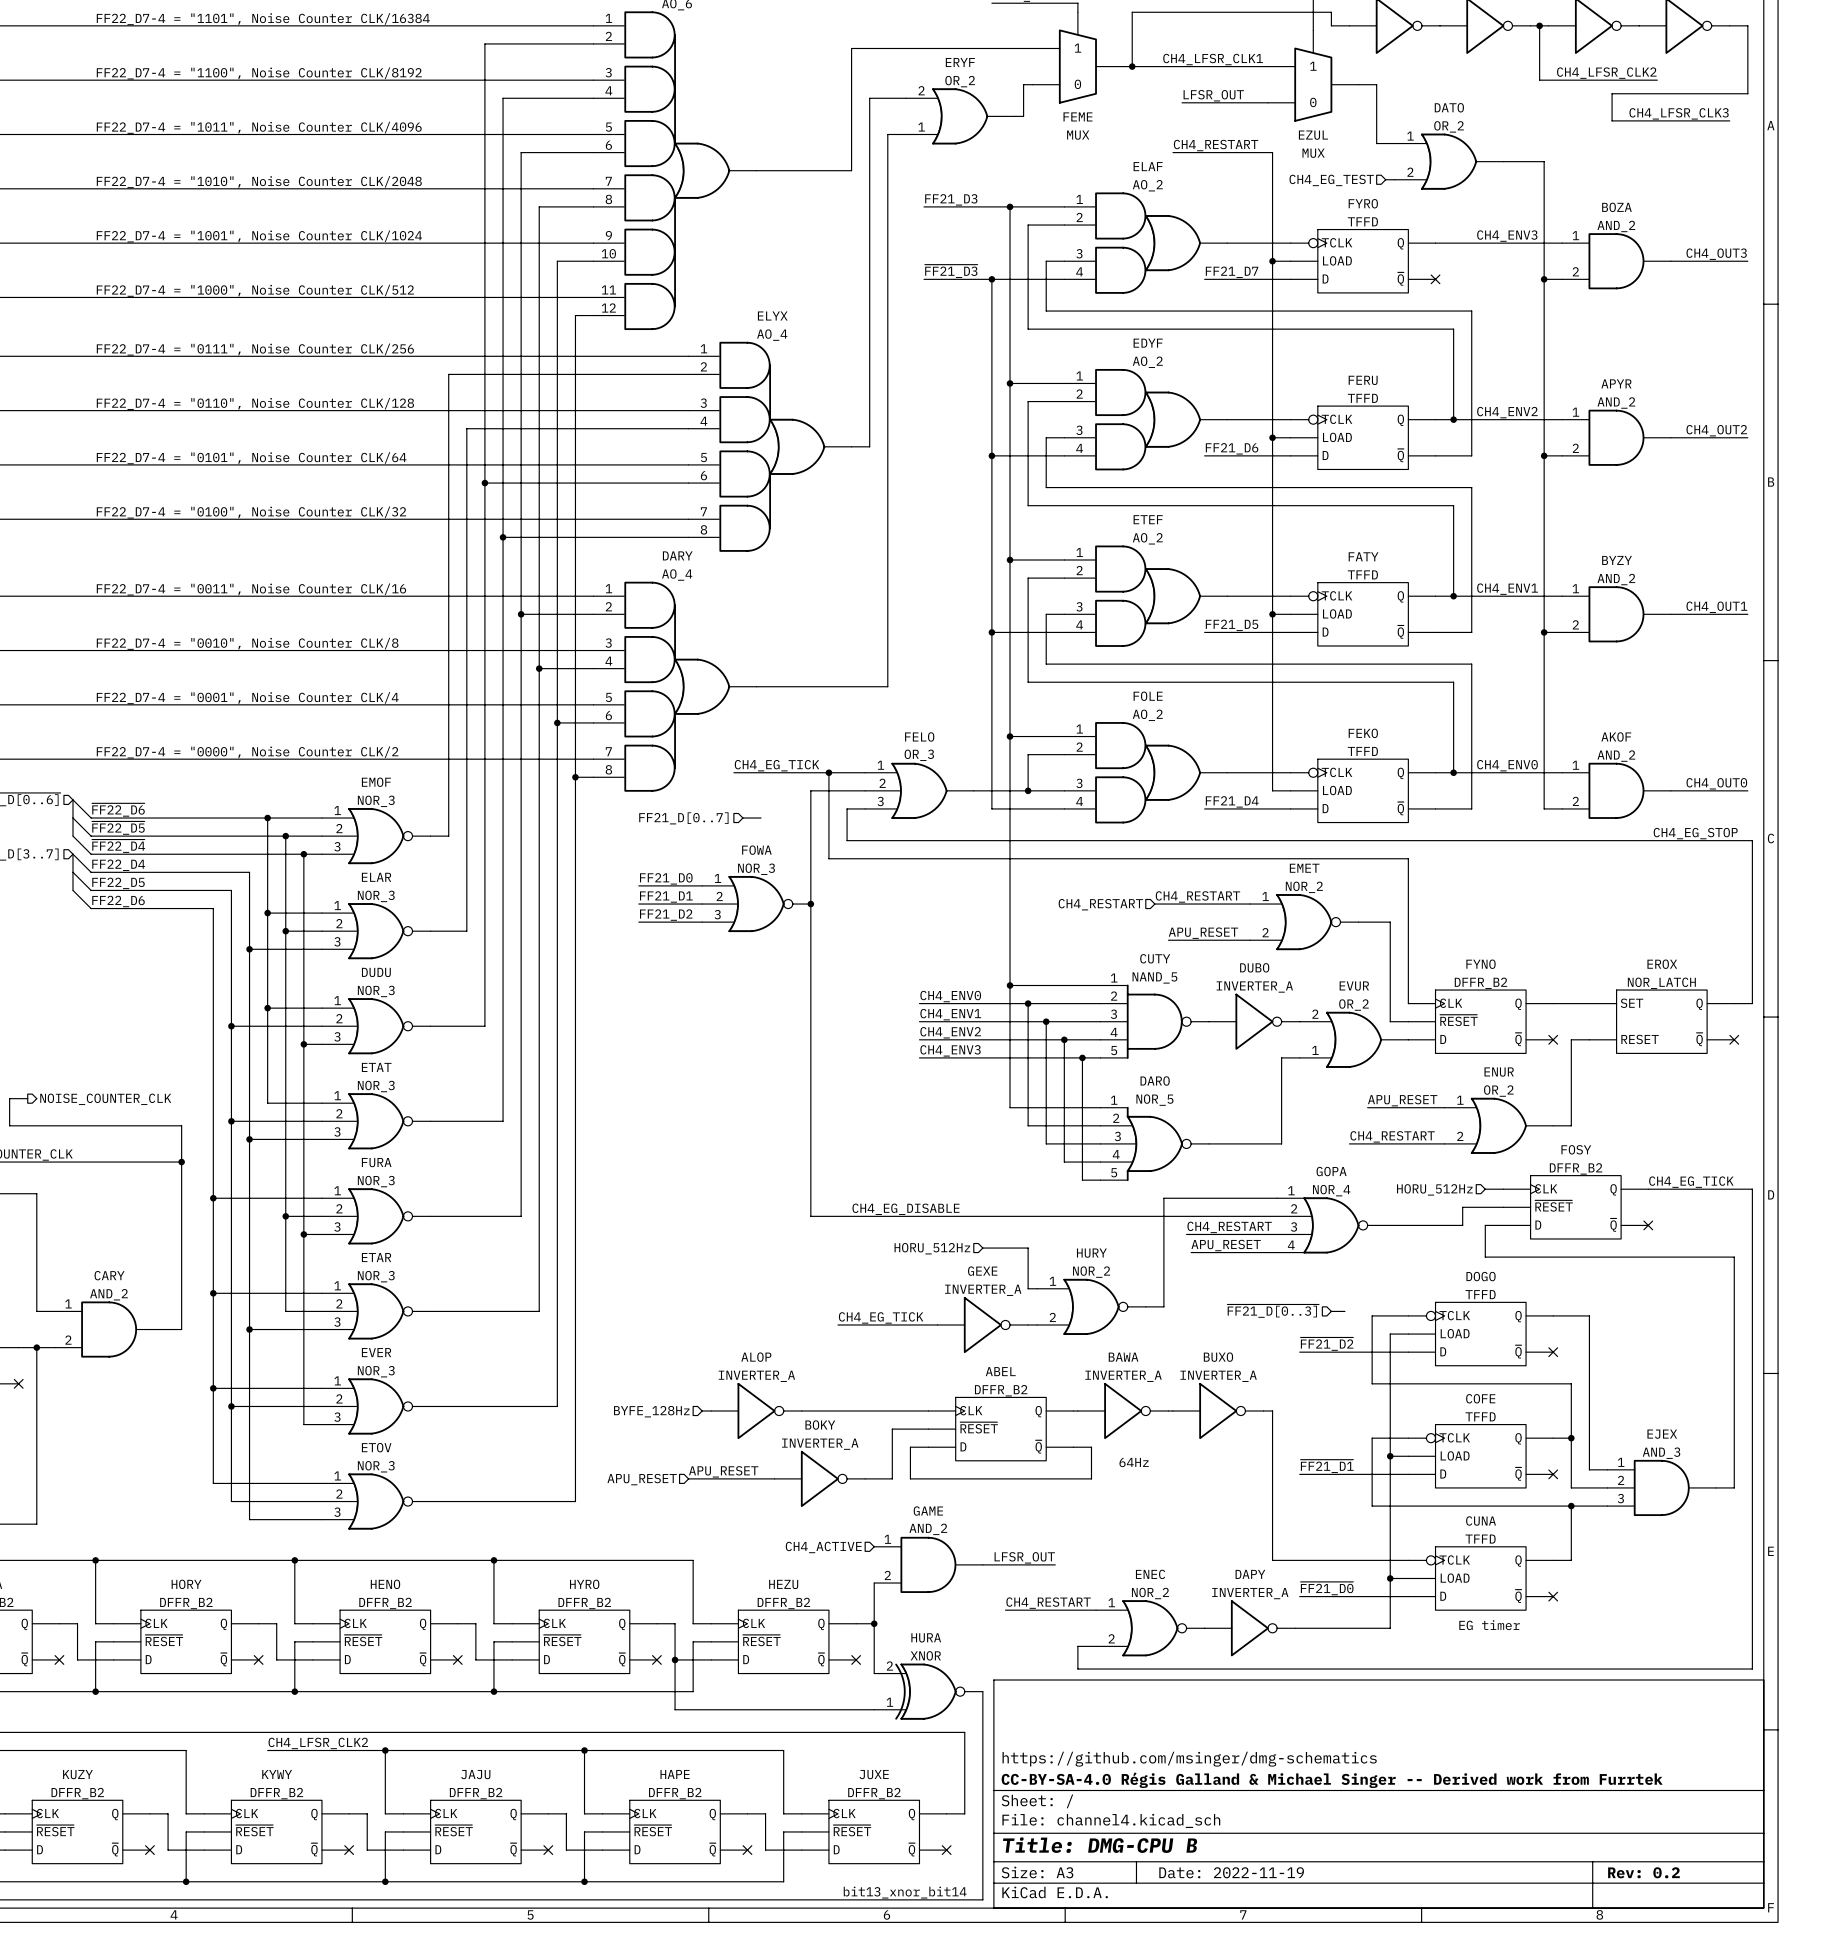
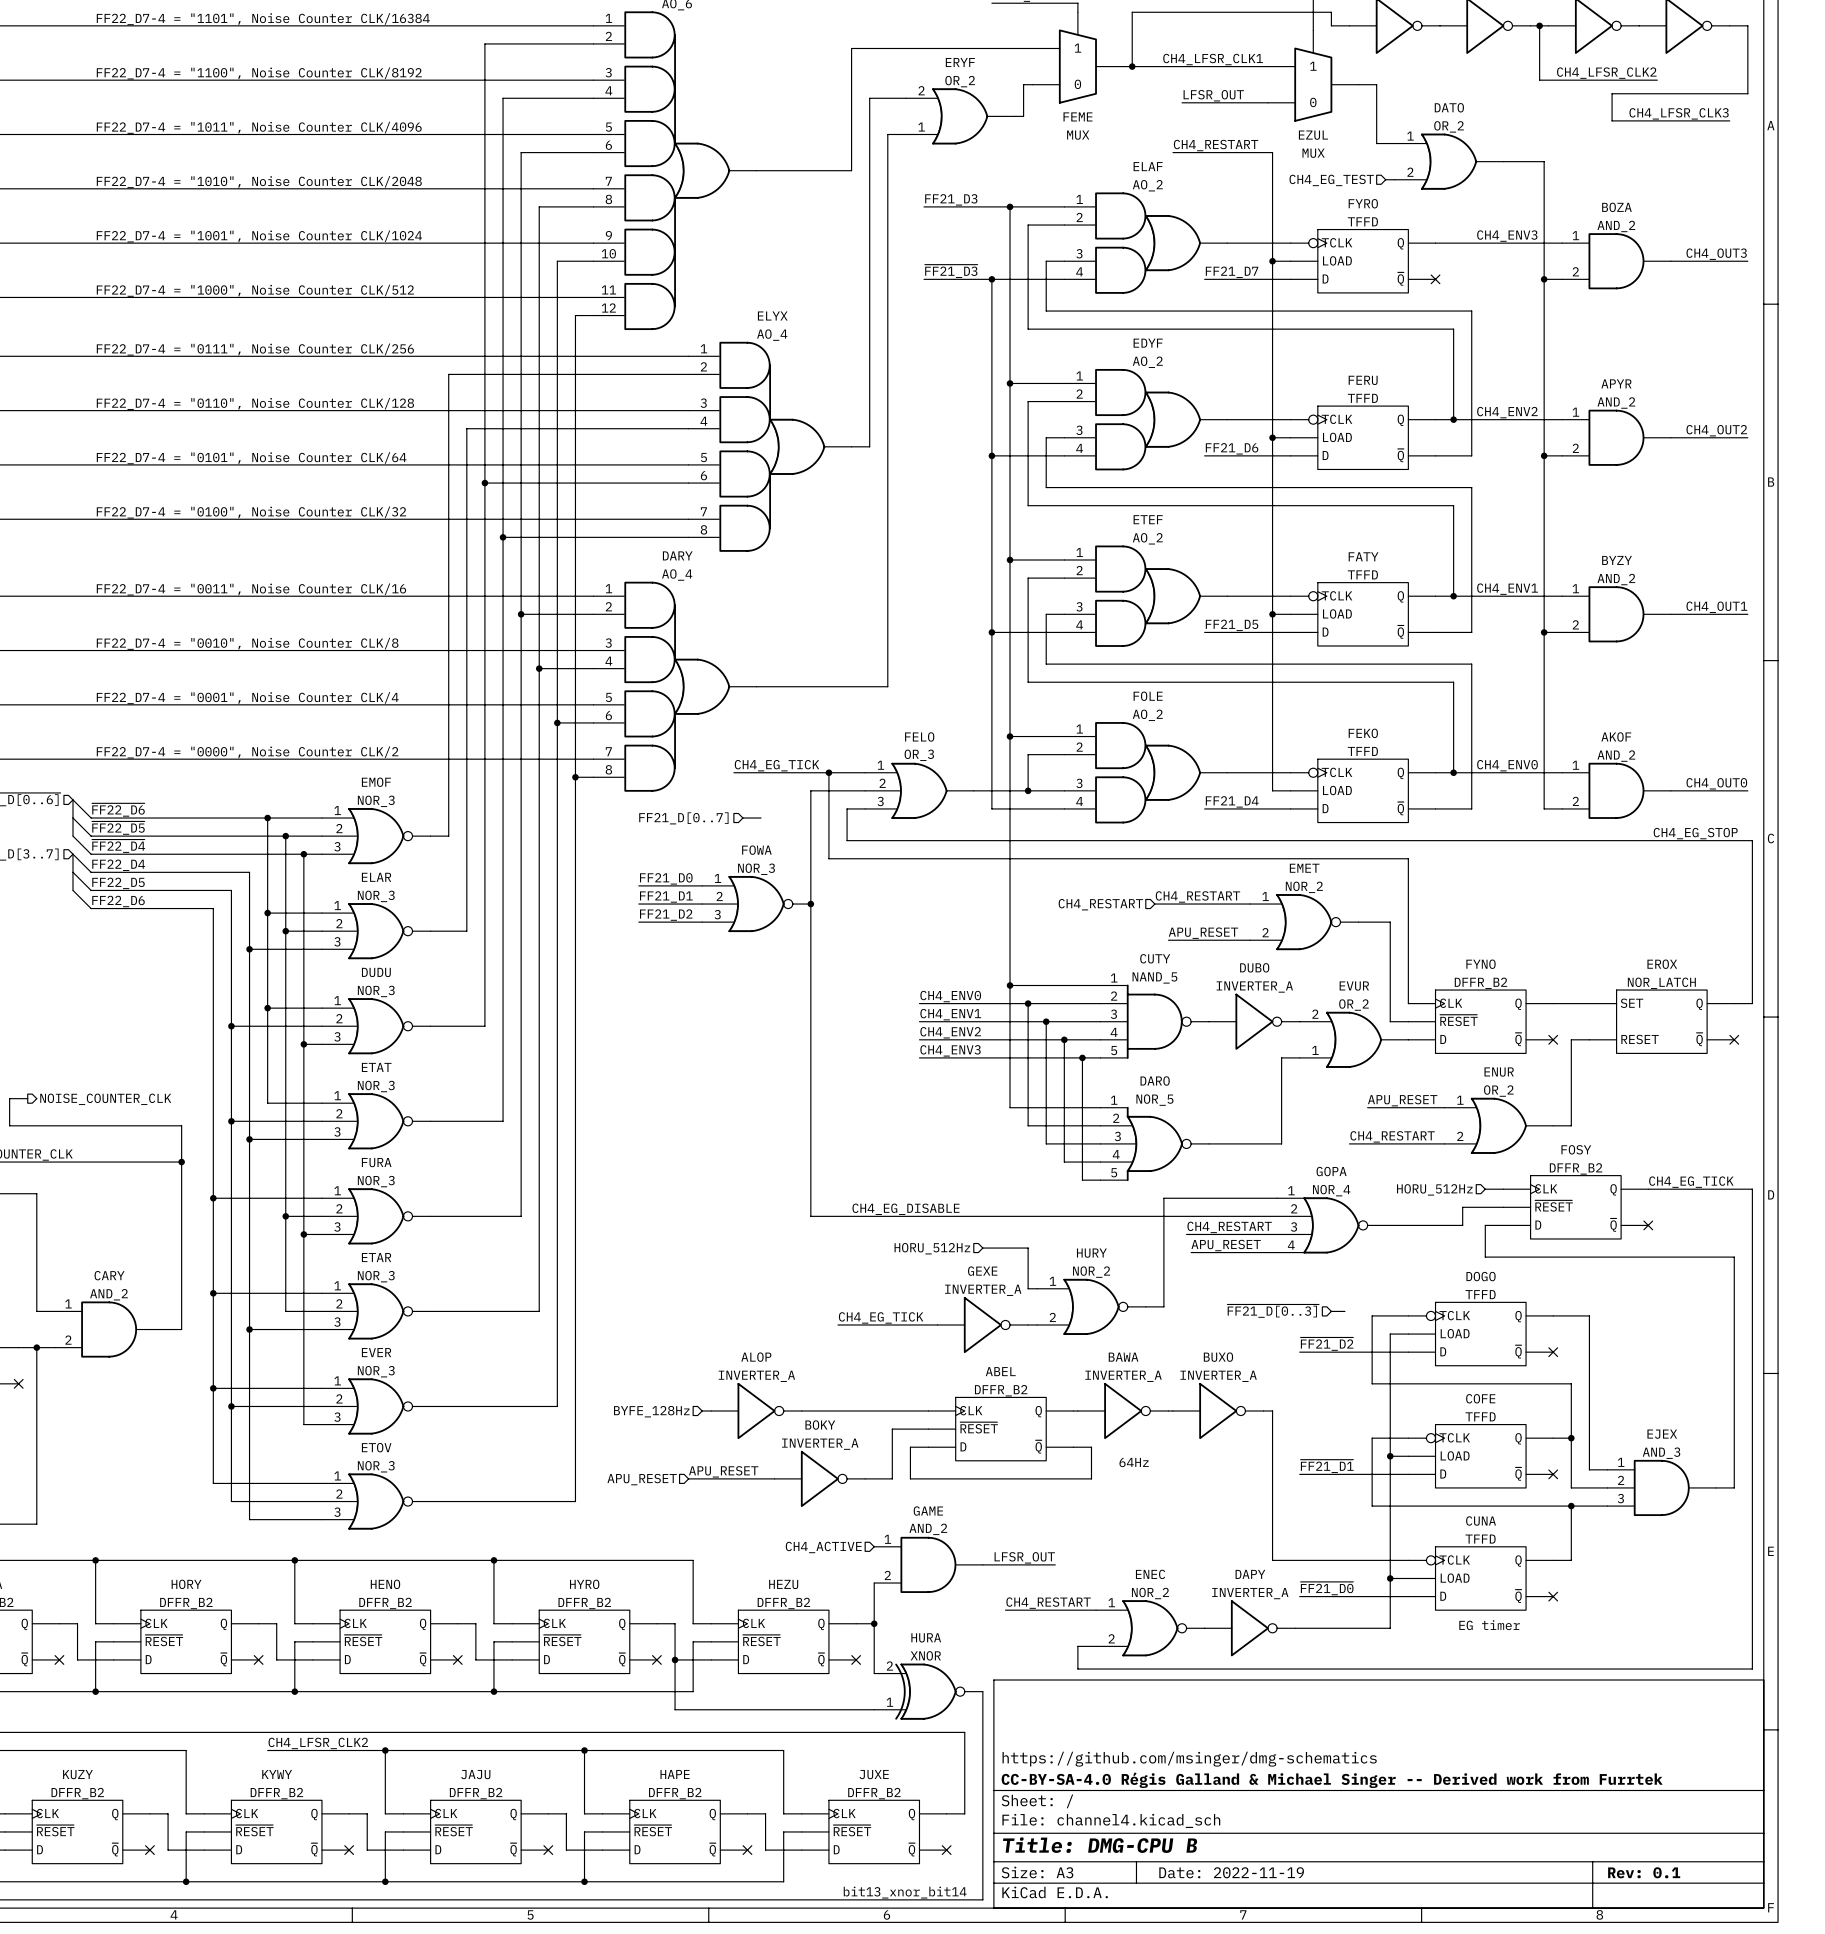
title block: Rev: 0.2 (1643, 1872) -> Rev: 0.1 (1644, 1872)

